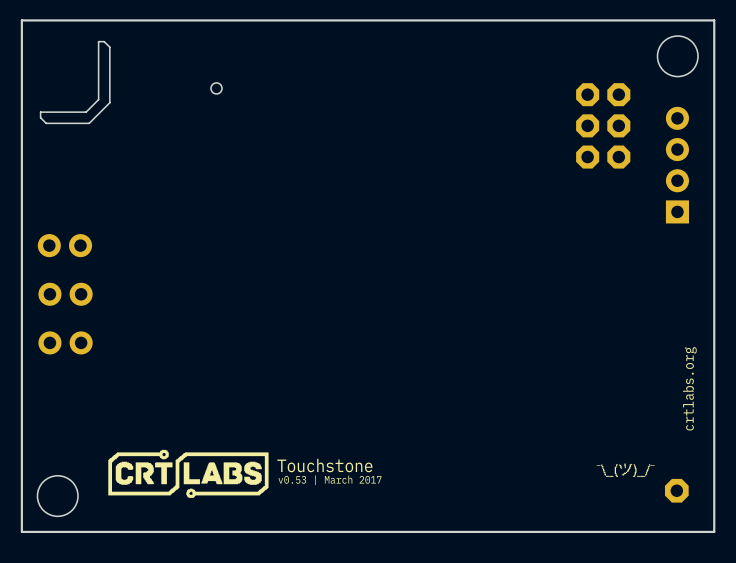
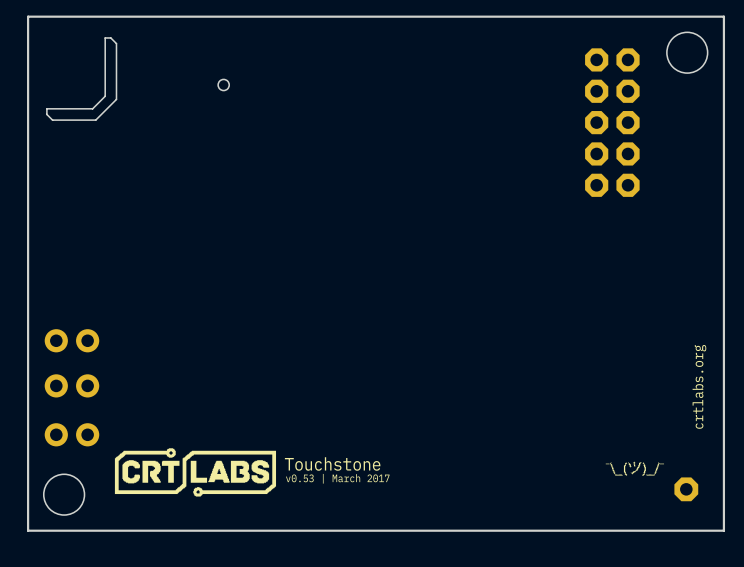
part footprint: [576, 83, 631, 169] -> [585, 48, 640, 197]
part: (677, 165) -> none
part: (64, 245) -> none
part: (65, 294) -> none
part: none -> (71, 385)
part: none -> (71, 434)

